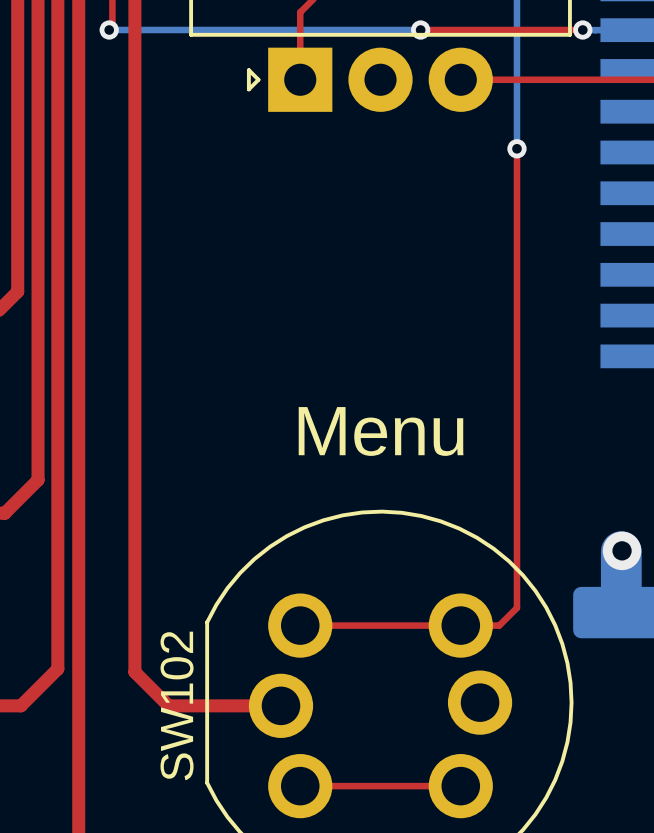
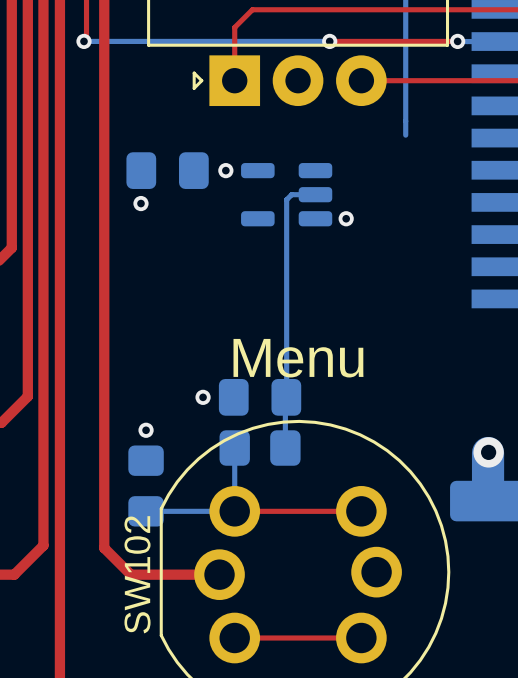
top track: (516, 148) (516, 607) (499, 625) (464, 625) -> none
via: (516, 148) -> none
part: none -> (167, 170)
via: none -> (225, 170)
part: none -> (286, 194)
bottom track: none -> (318, 194) (291, 194) (286, 199) (285, 448)
via: none -> (140, 203)
via: none -> (346, 218)
via: none -> (203, 397)
part: none -> (260, 397)
via: none -> (146, 430)
bottom track: none -> (234, 448) (234, 511) (146, 511)
part: none -> (260, 448)
part: none -> (146, 486)

